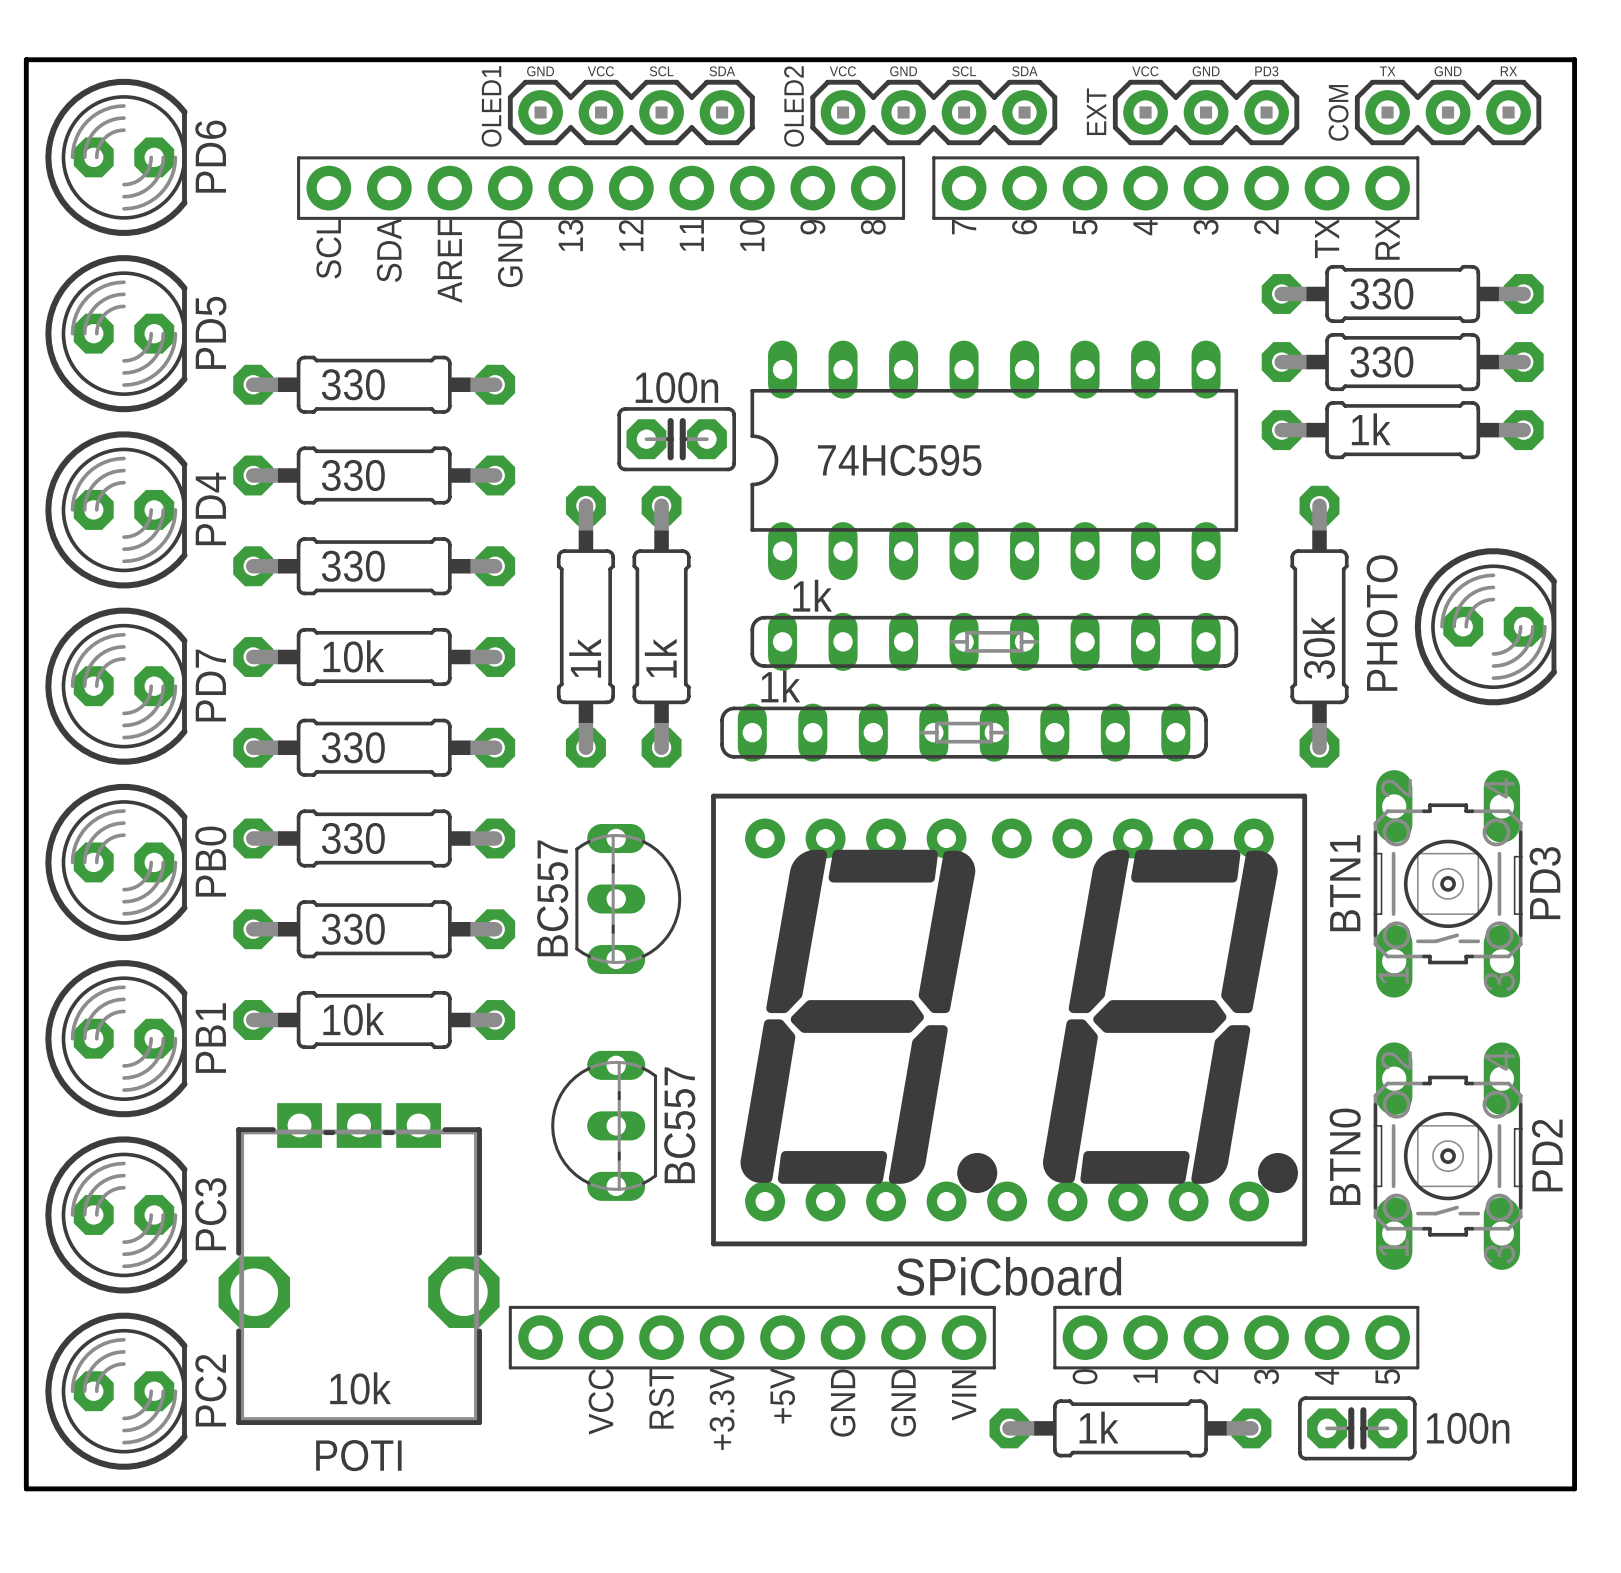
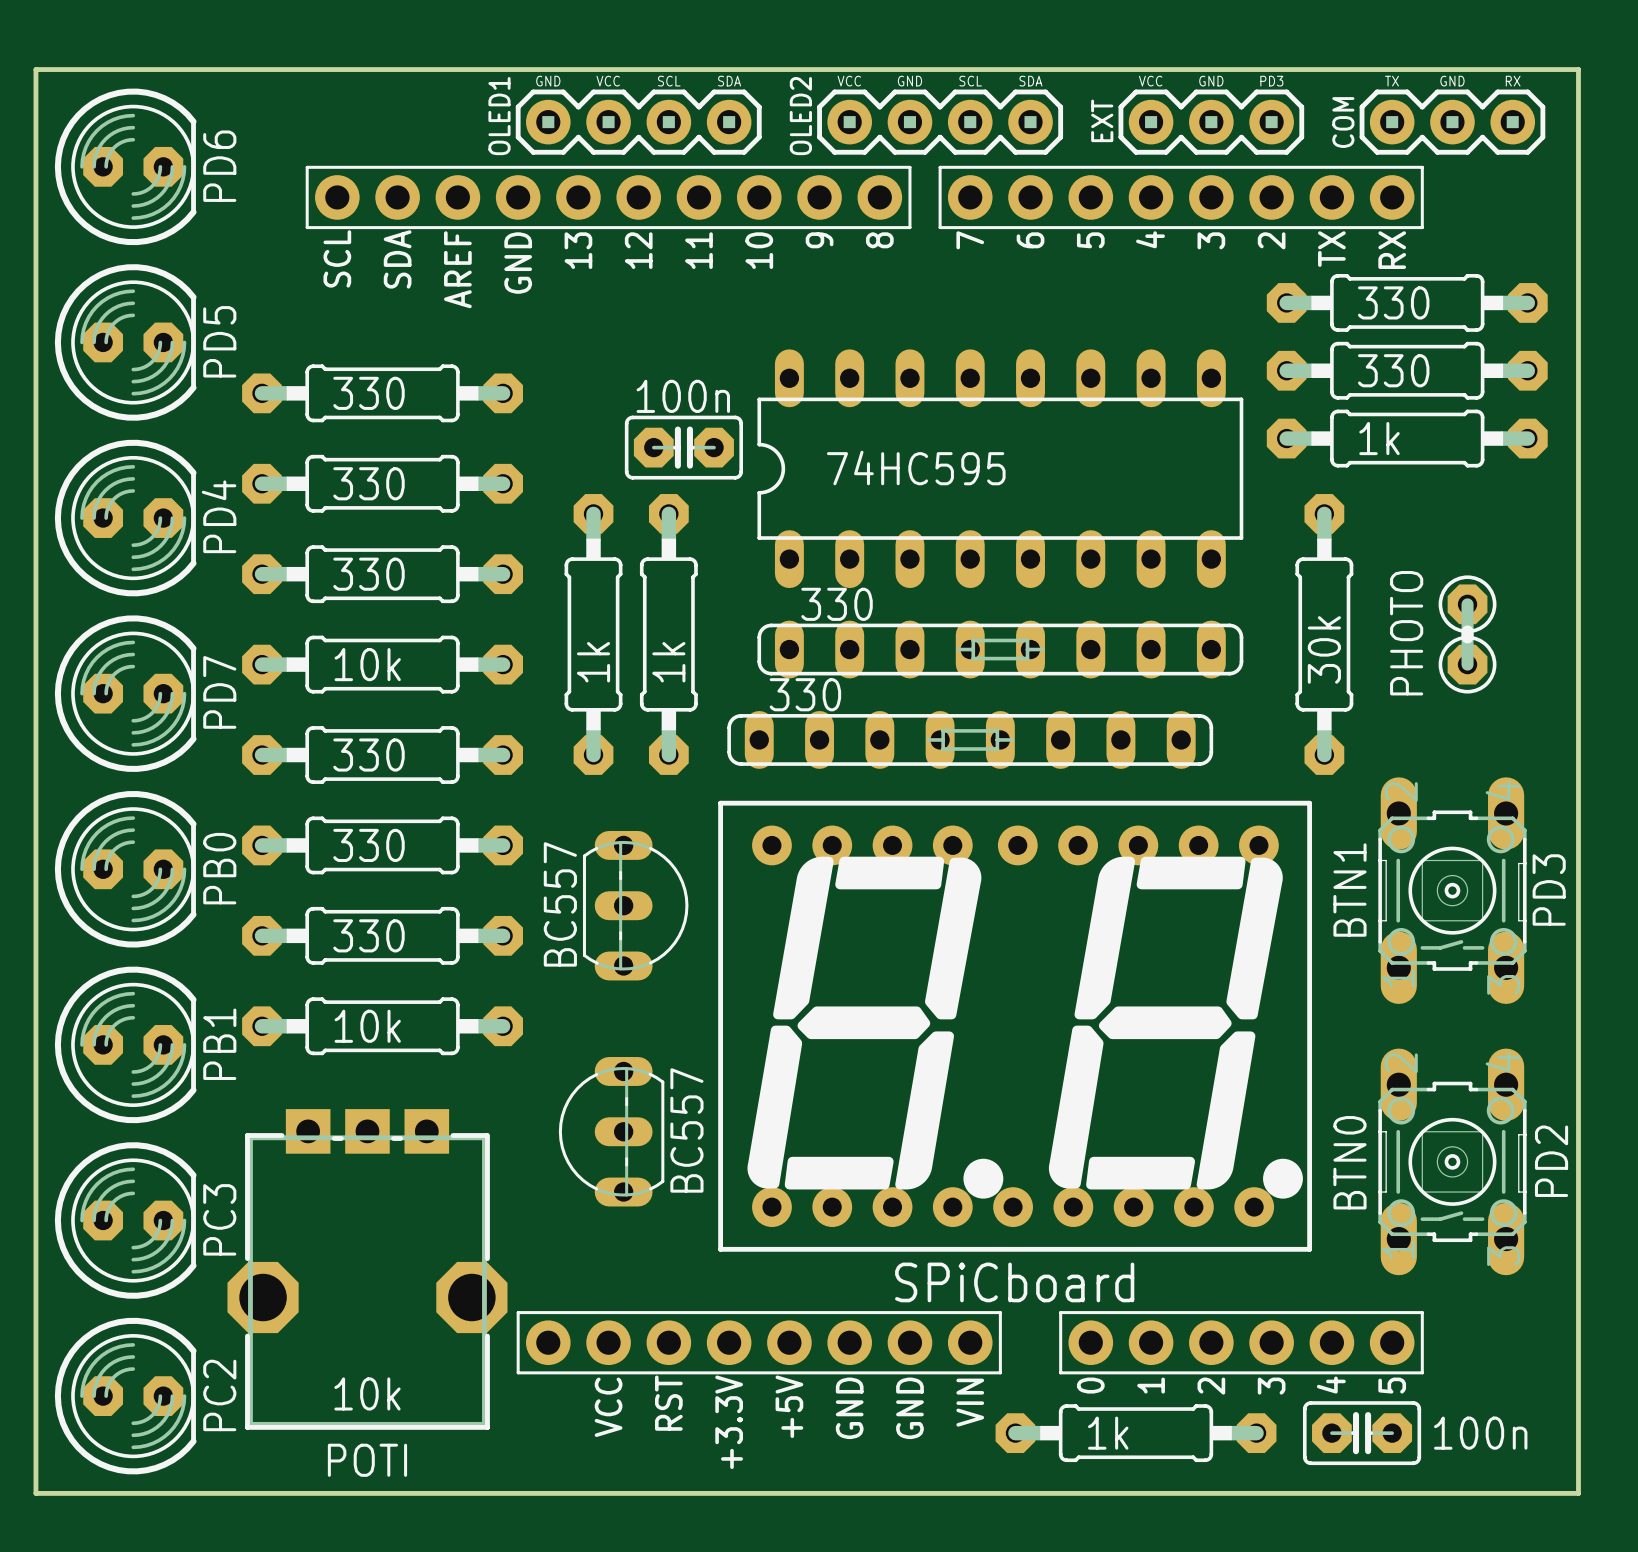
PHOTO footprint: [1414, 548, 1557, 706] -> [1438, 575, 1497, 694]
part value: 1k (812, 595) -> 330 (837, 604)
part value: 1k (780, 686) -> 330 (805, 694)

